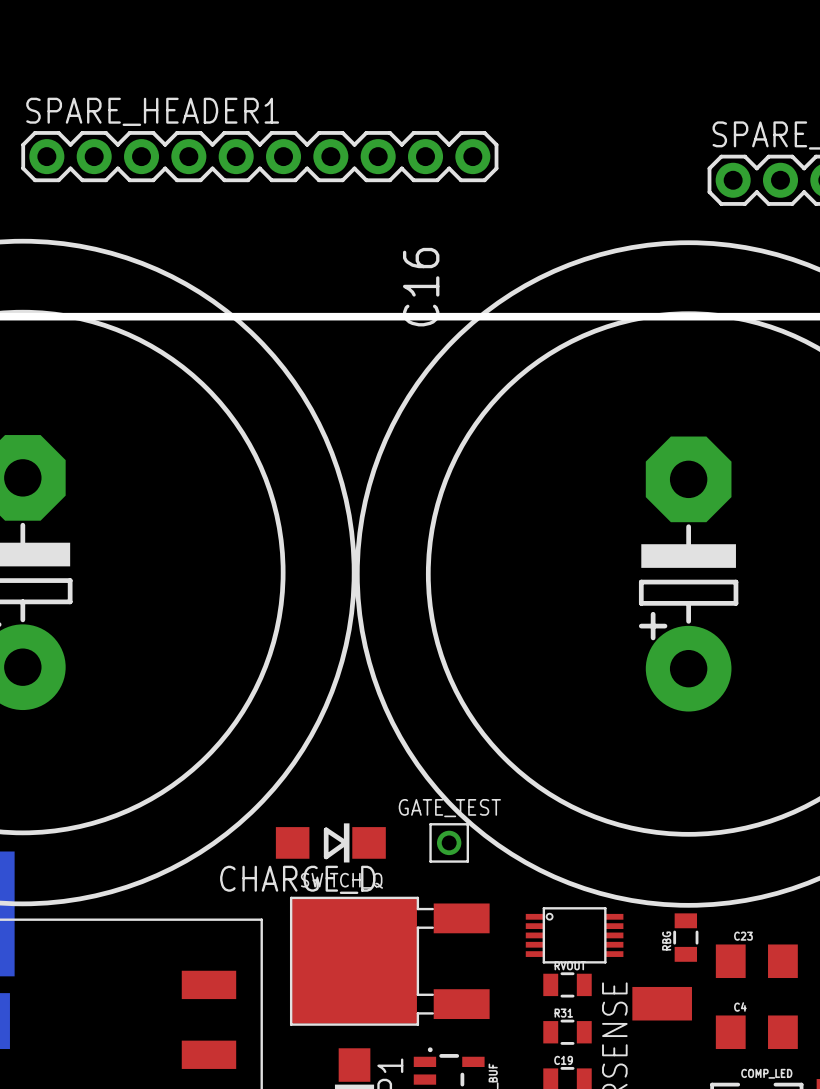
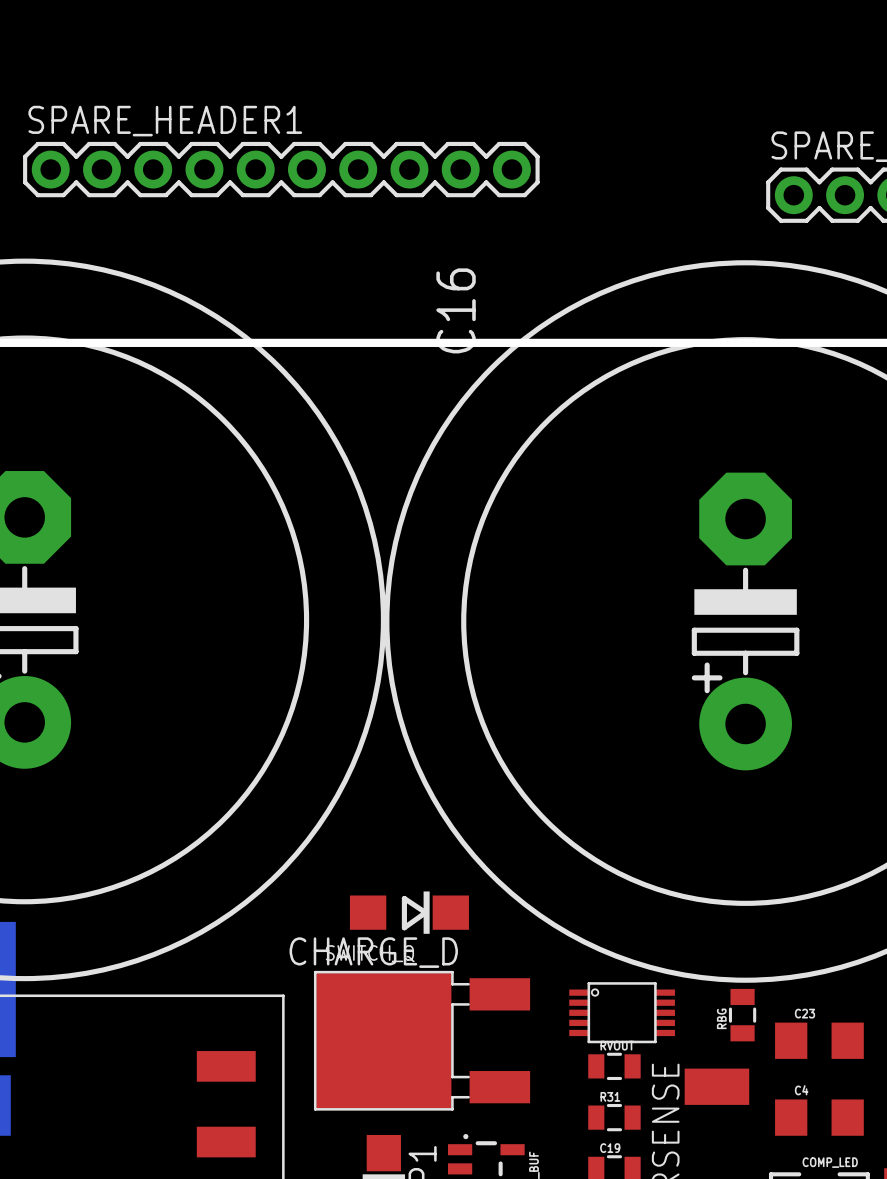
CHARGE_D position: (330, 842) -> (409, 912)
GATE_TEST: (449, 842) -> none

